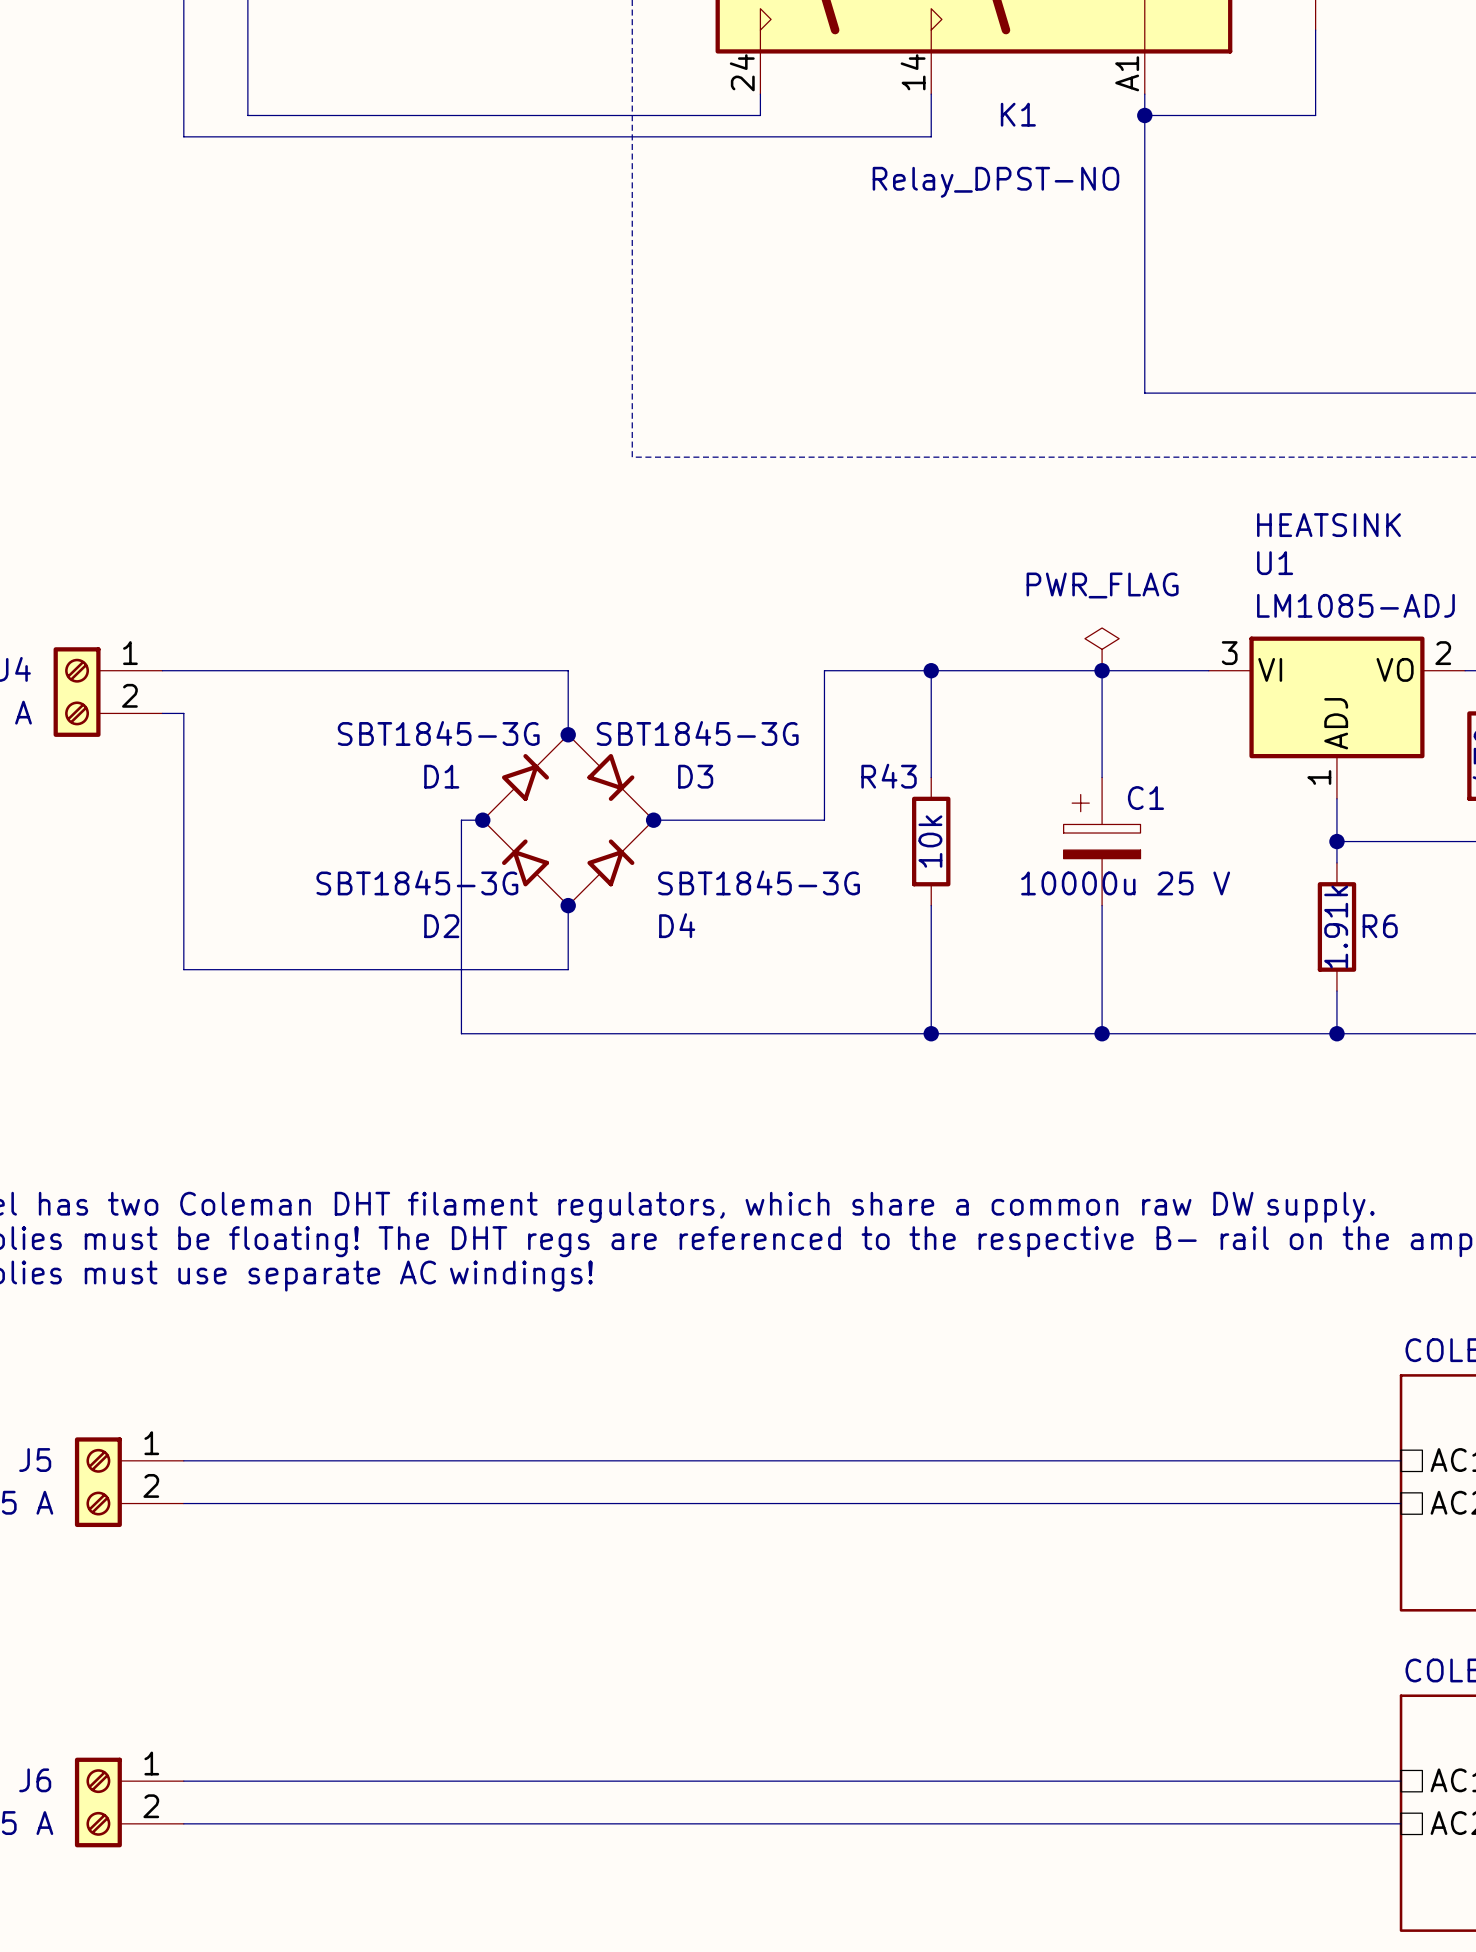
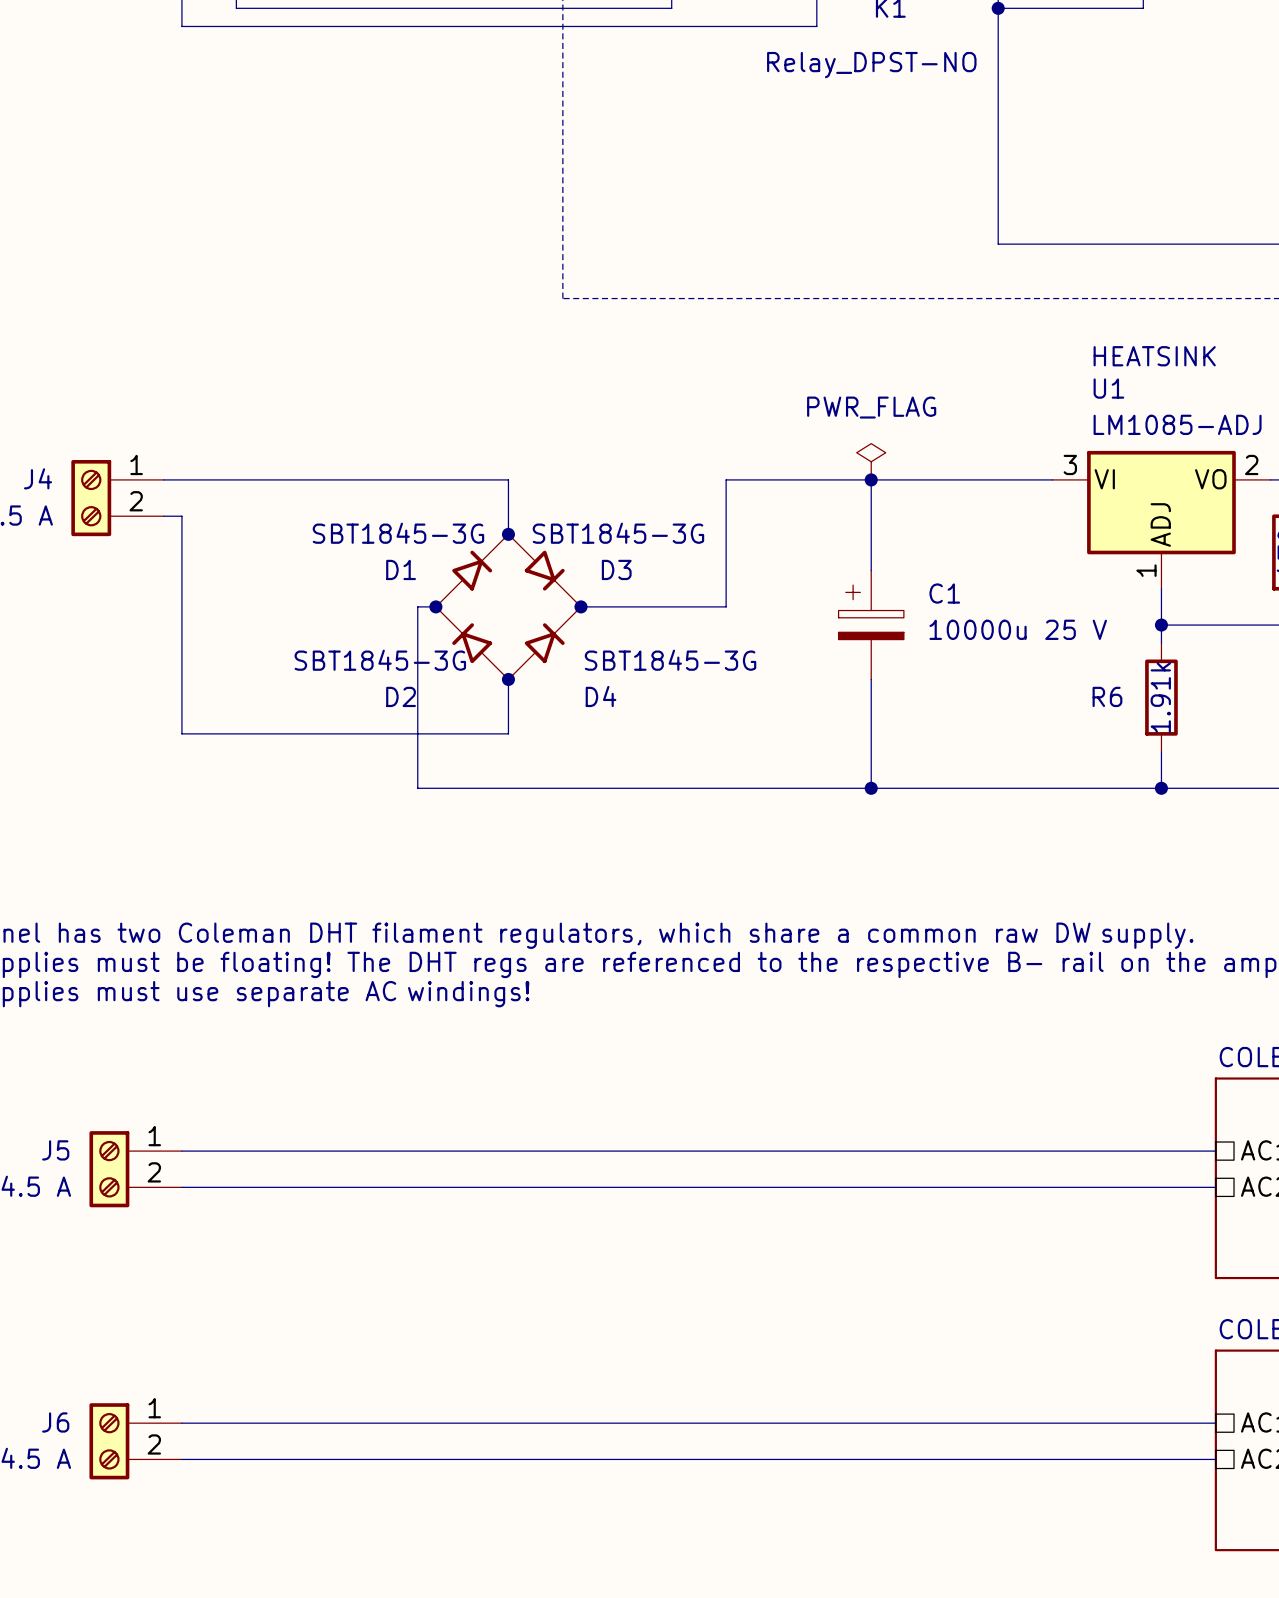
power symbol position: PWR_FLAG (1102, 649) -> PWR_FLAG (871, 461)
wire: (931, 670) (931, 777) -> (871, 479) (871, 570)
junction: (931, 670) -> none
junction: none -> (871, 479)
wire: (1102, 670) (1102, 777) -> none
junction: (1102, 670) -> none
C1 name position: C1 (1145, 798) -> C1 (944, 593)
R43: 10k (931, 841) -> none
C1 position: (1102, 841) -> (871, 625)
C1 value position: 10000u 25 V (1125, 883) -> 10000u 25 V (1018, 629)
wire: (931, 905) (931, 1033) -> (871, 679) (871, 788)
wire: (1102, 905) (1102, 1033) -> none
R6 name position: R6 (1380, 926) -> R6 (1107, 696)
junction: (931, 1033) -> none
junction: none -> (871, 788)
junction: (1102, 1033) -> none

